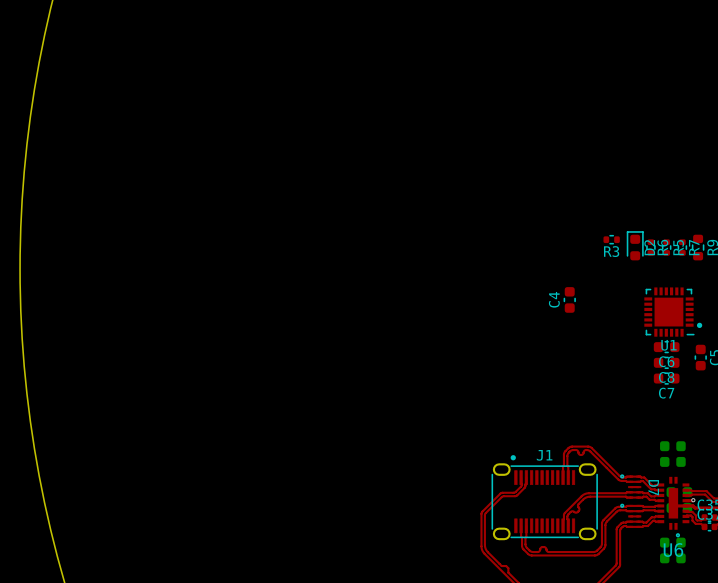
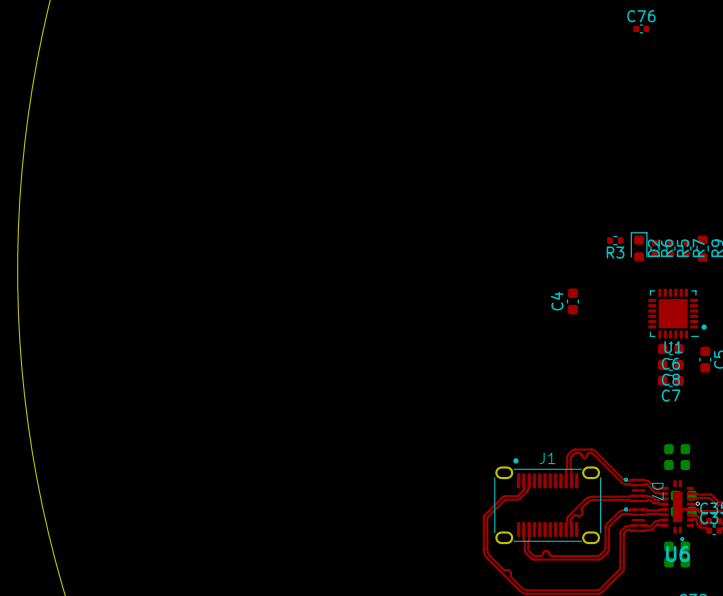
C76: none -> (641, 28)

